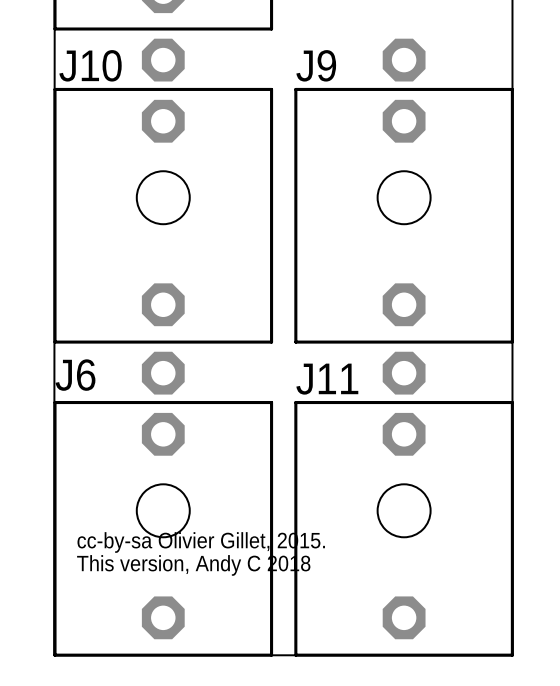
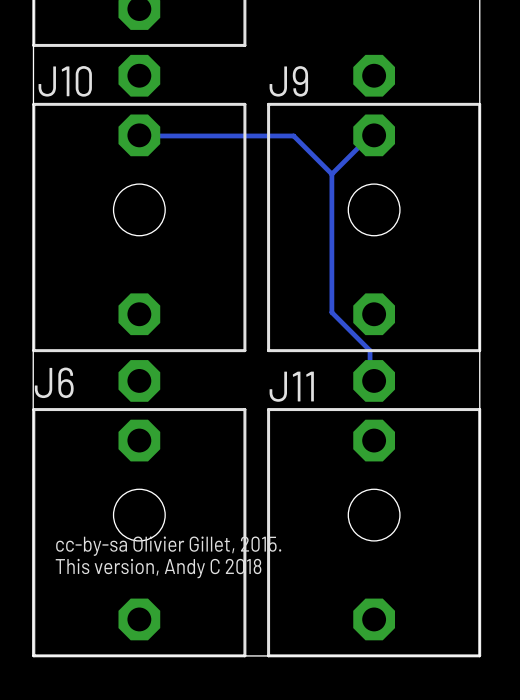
track: none -> (139, 135) (293, 135) (331, 174)
track: none -> (374, 135) (370, 135) (331, 174)
track: none -> (331, 174) (331, 312) (370, 350) (370, 379) (374, 380)

